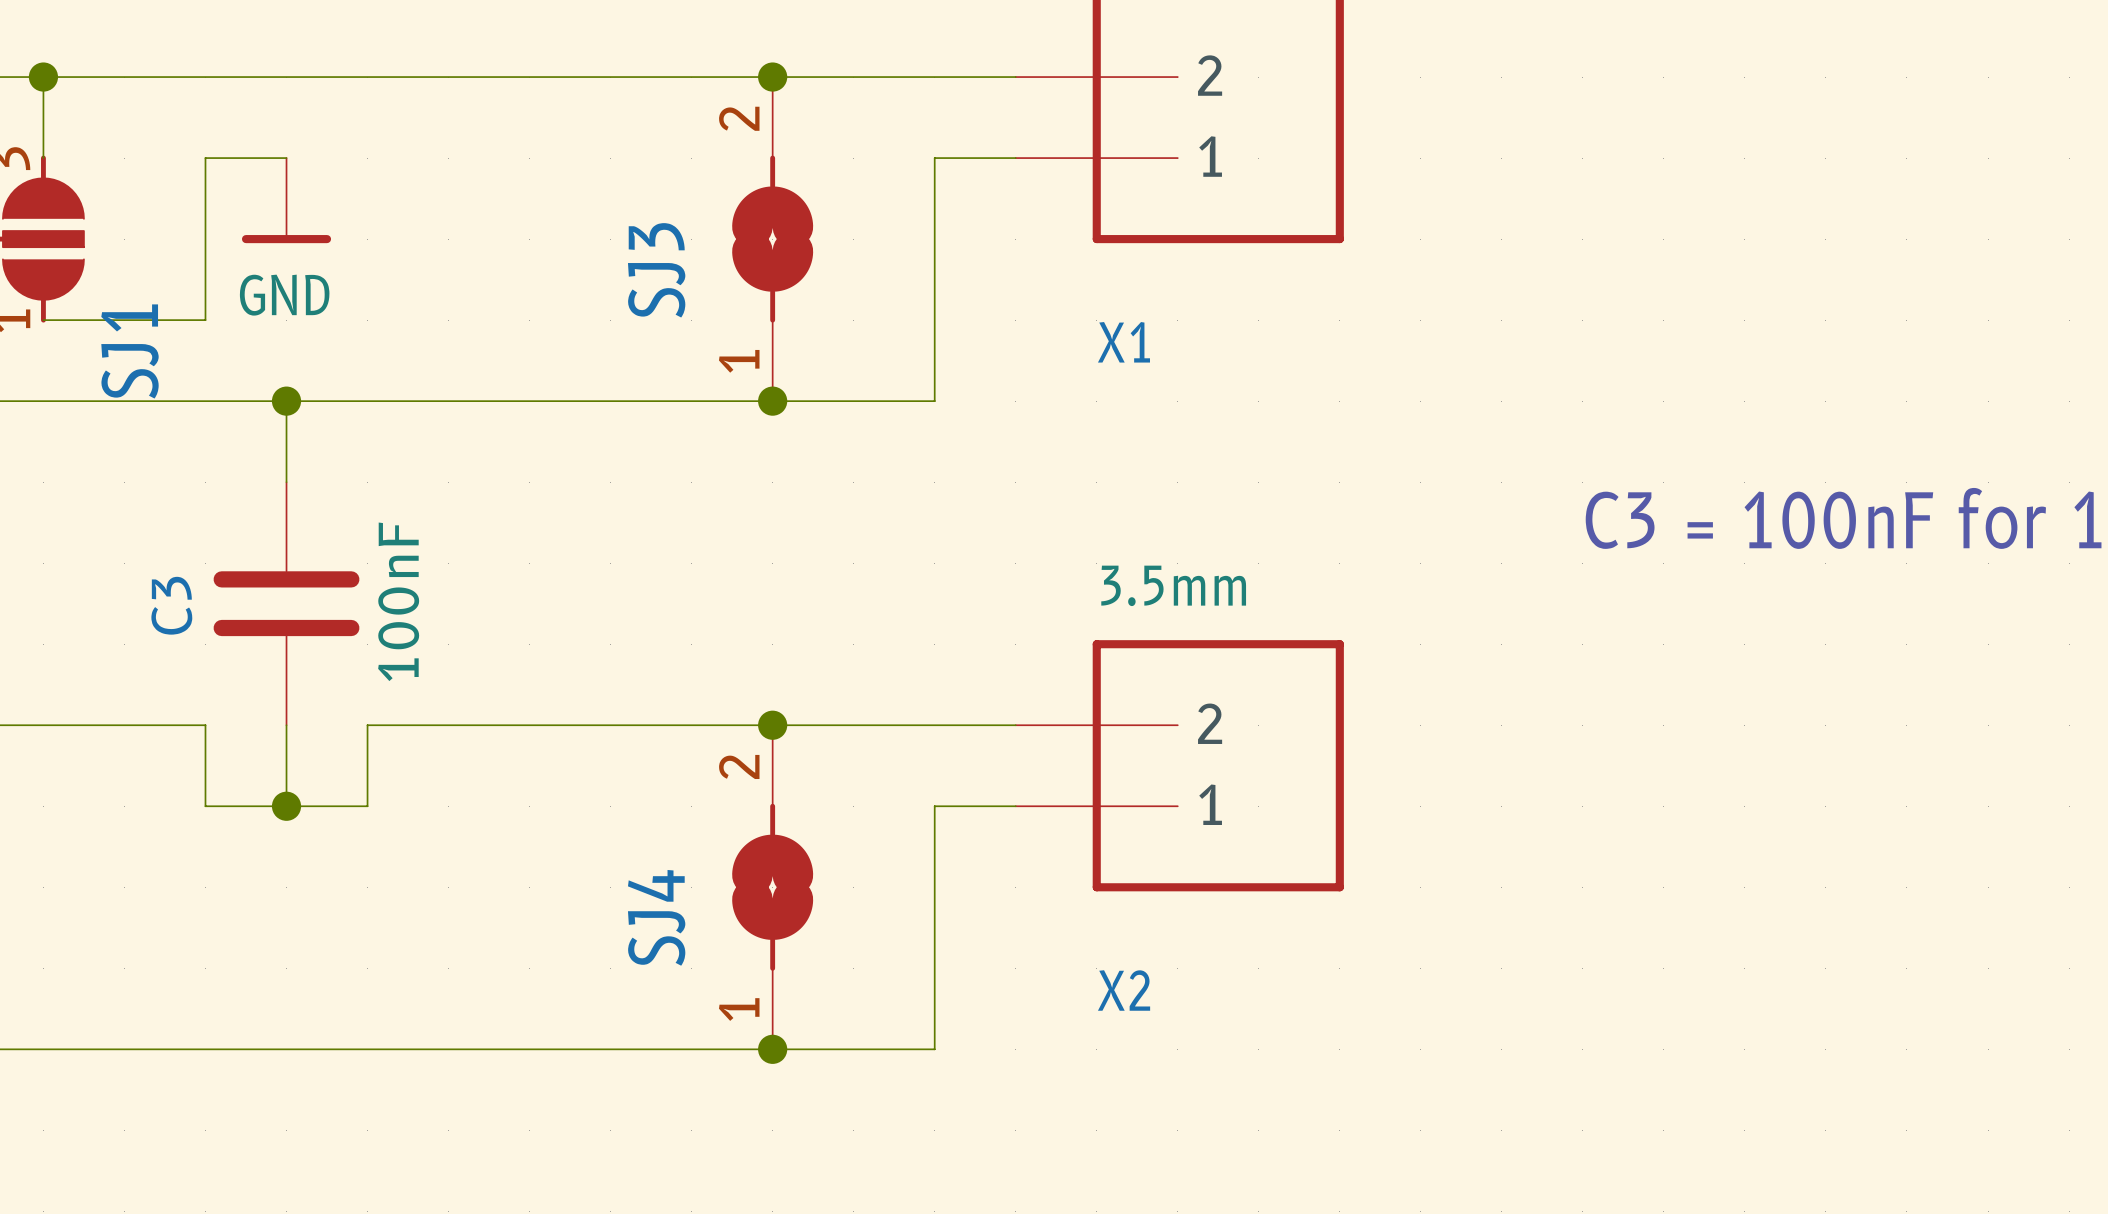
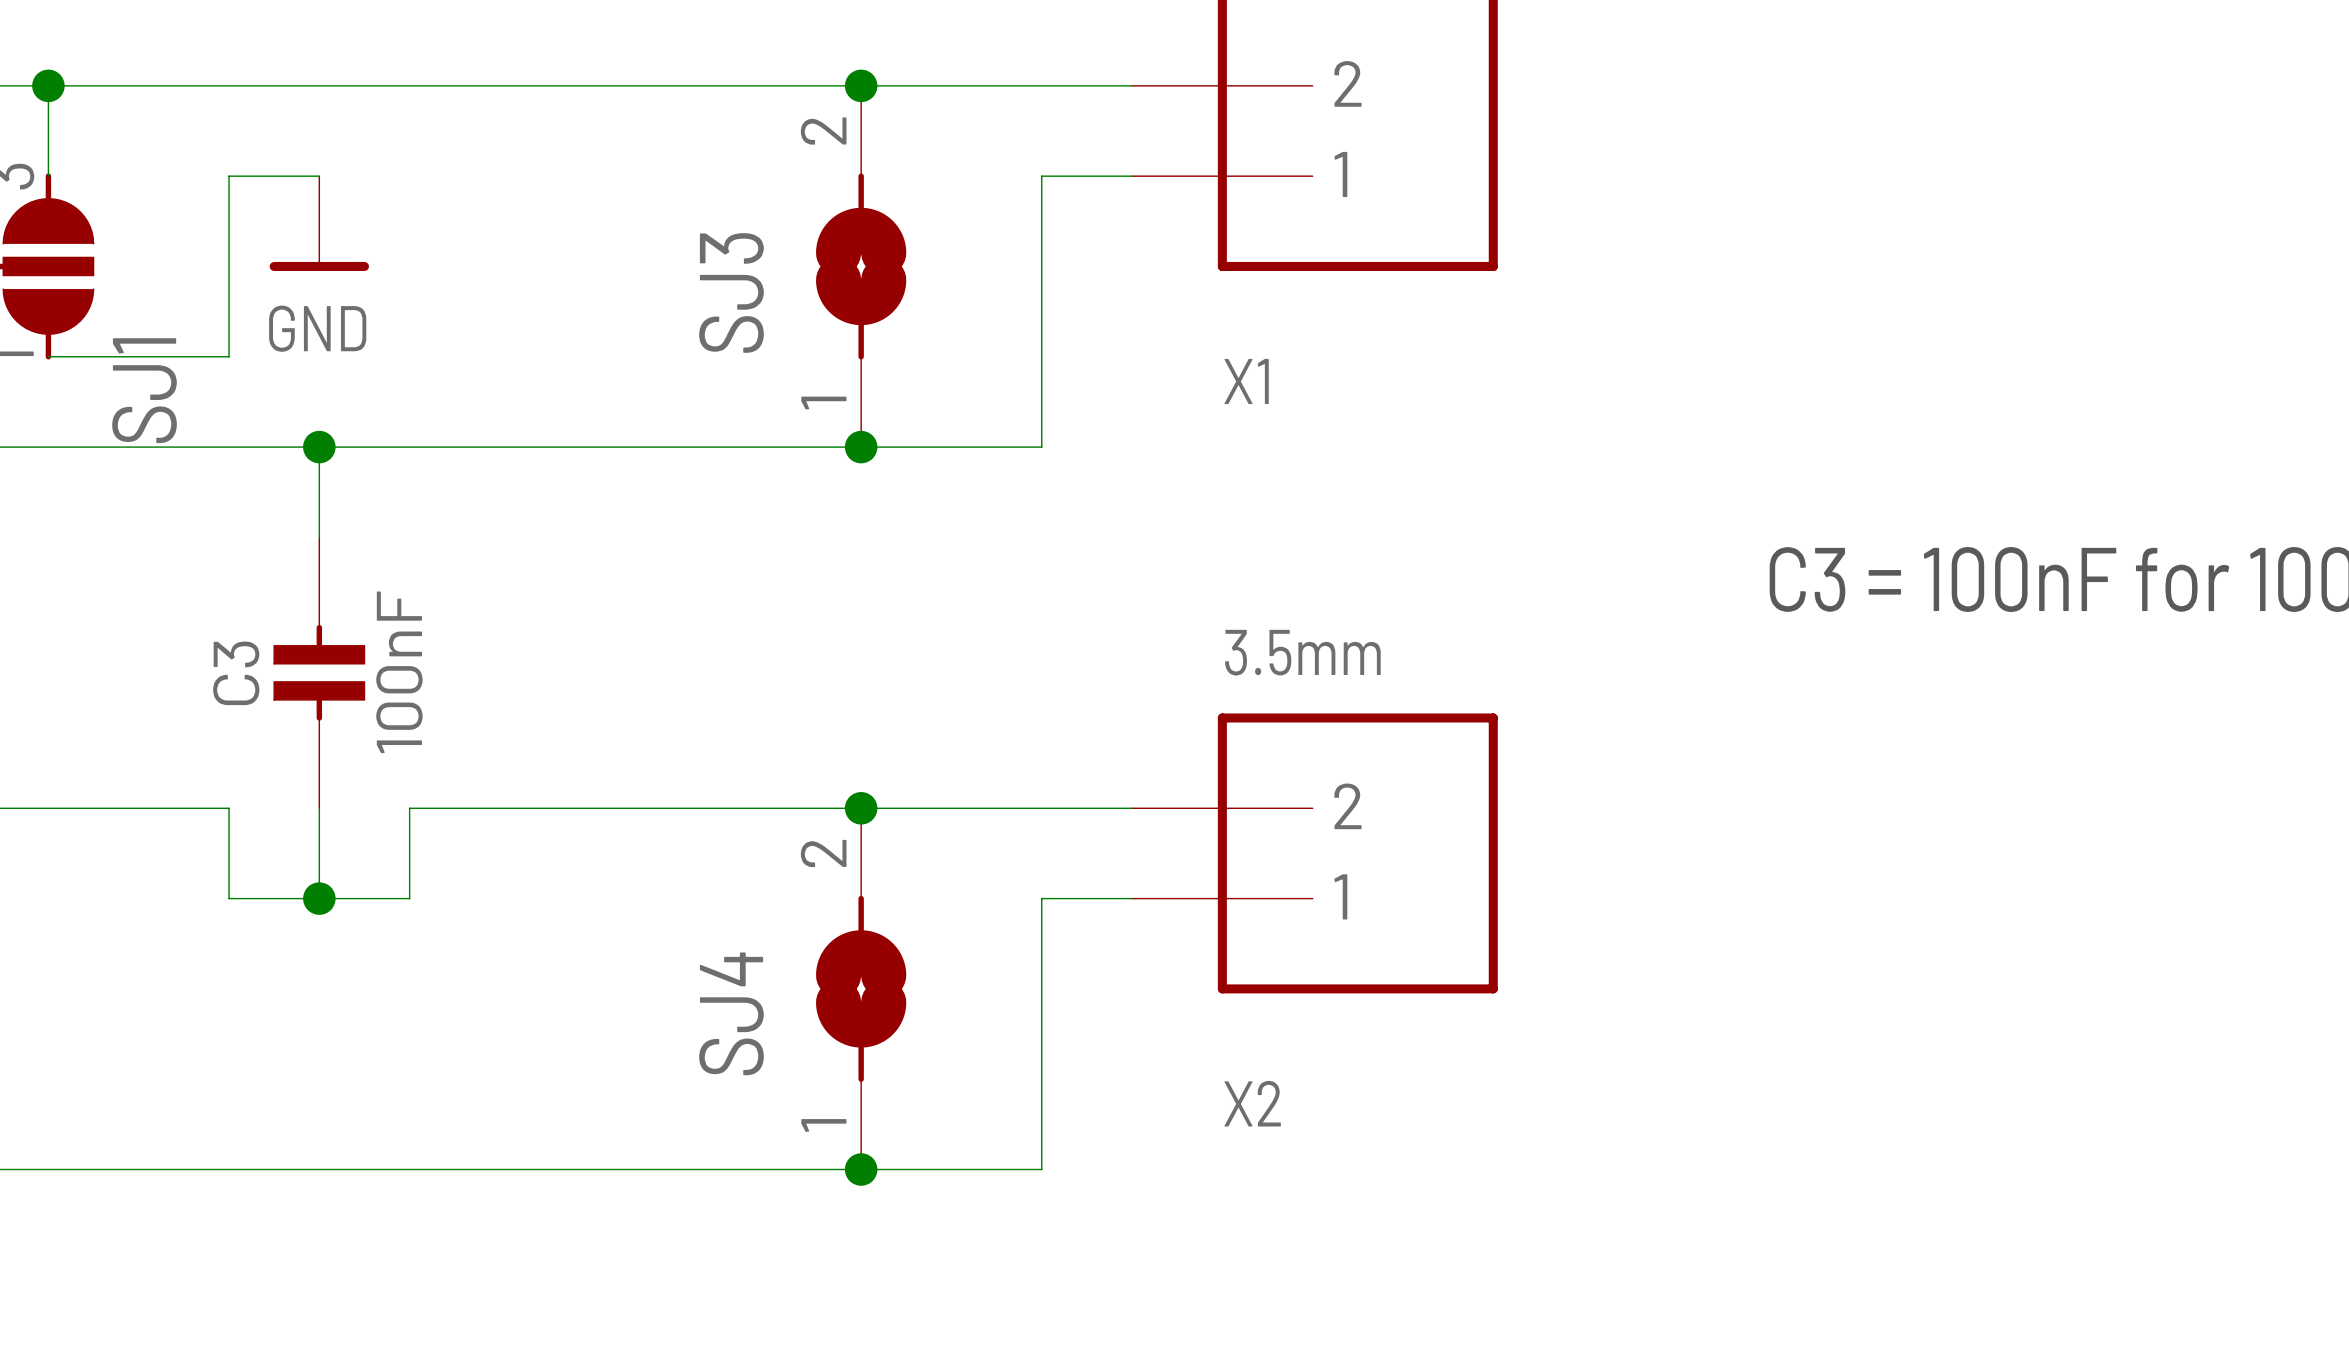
C3 symbol: [213, 482, 360, 726] -> [274, 537, 365, 809]
C3 value position: 100nF (398, 601) -> 100nF (399, 672)
C3 name position: C3 (171, 605) -> C3 (236, 673)

